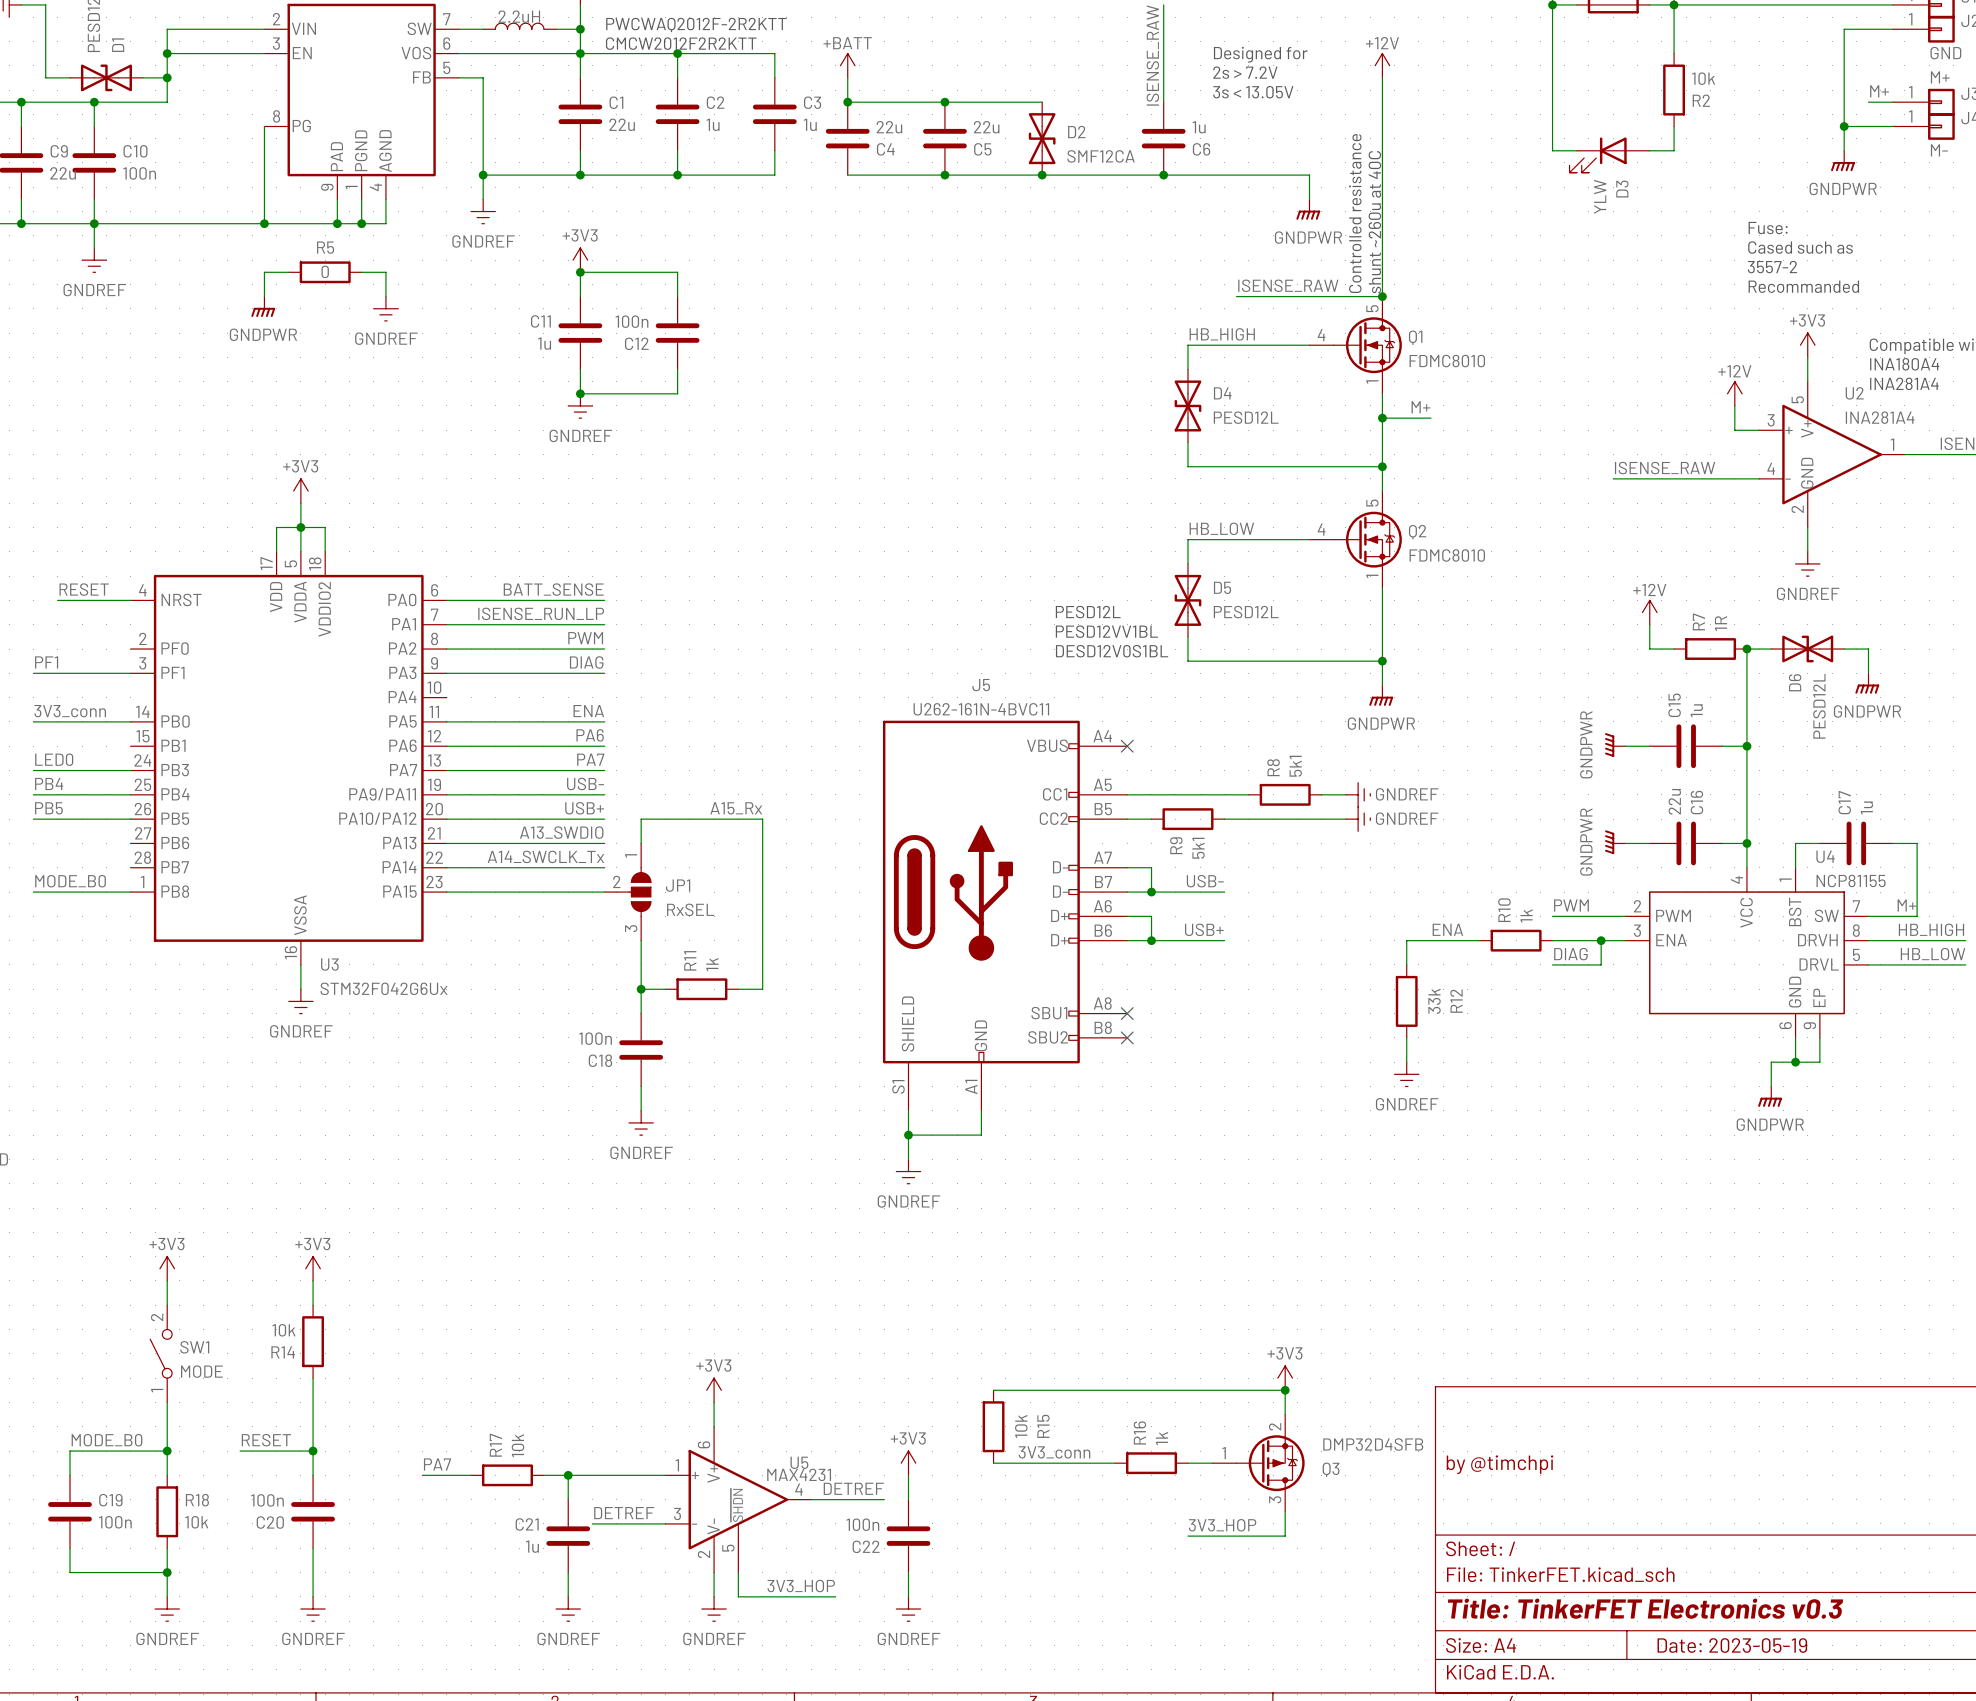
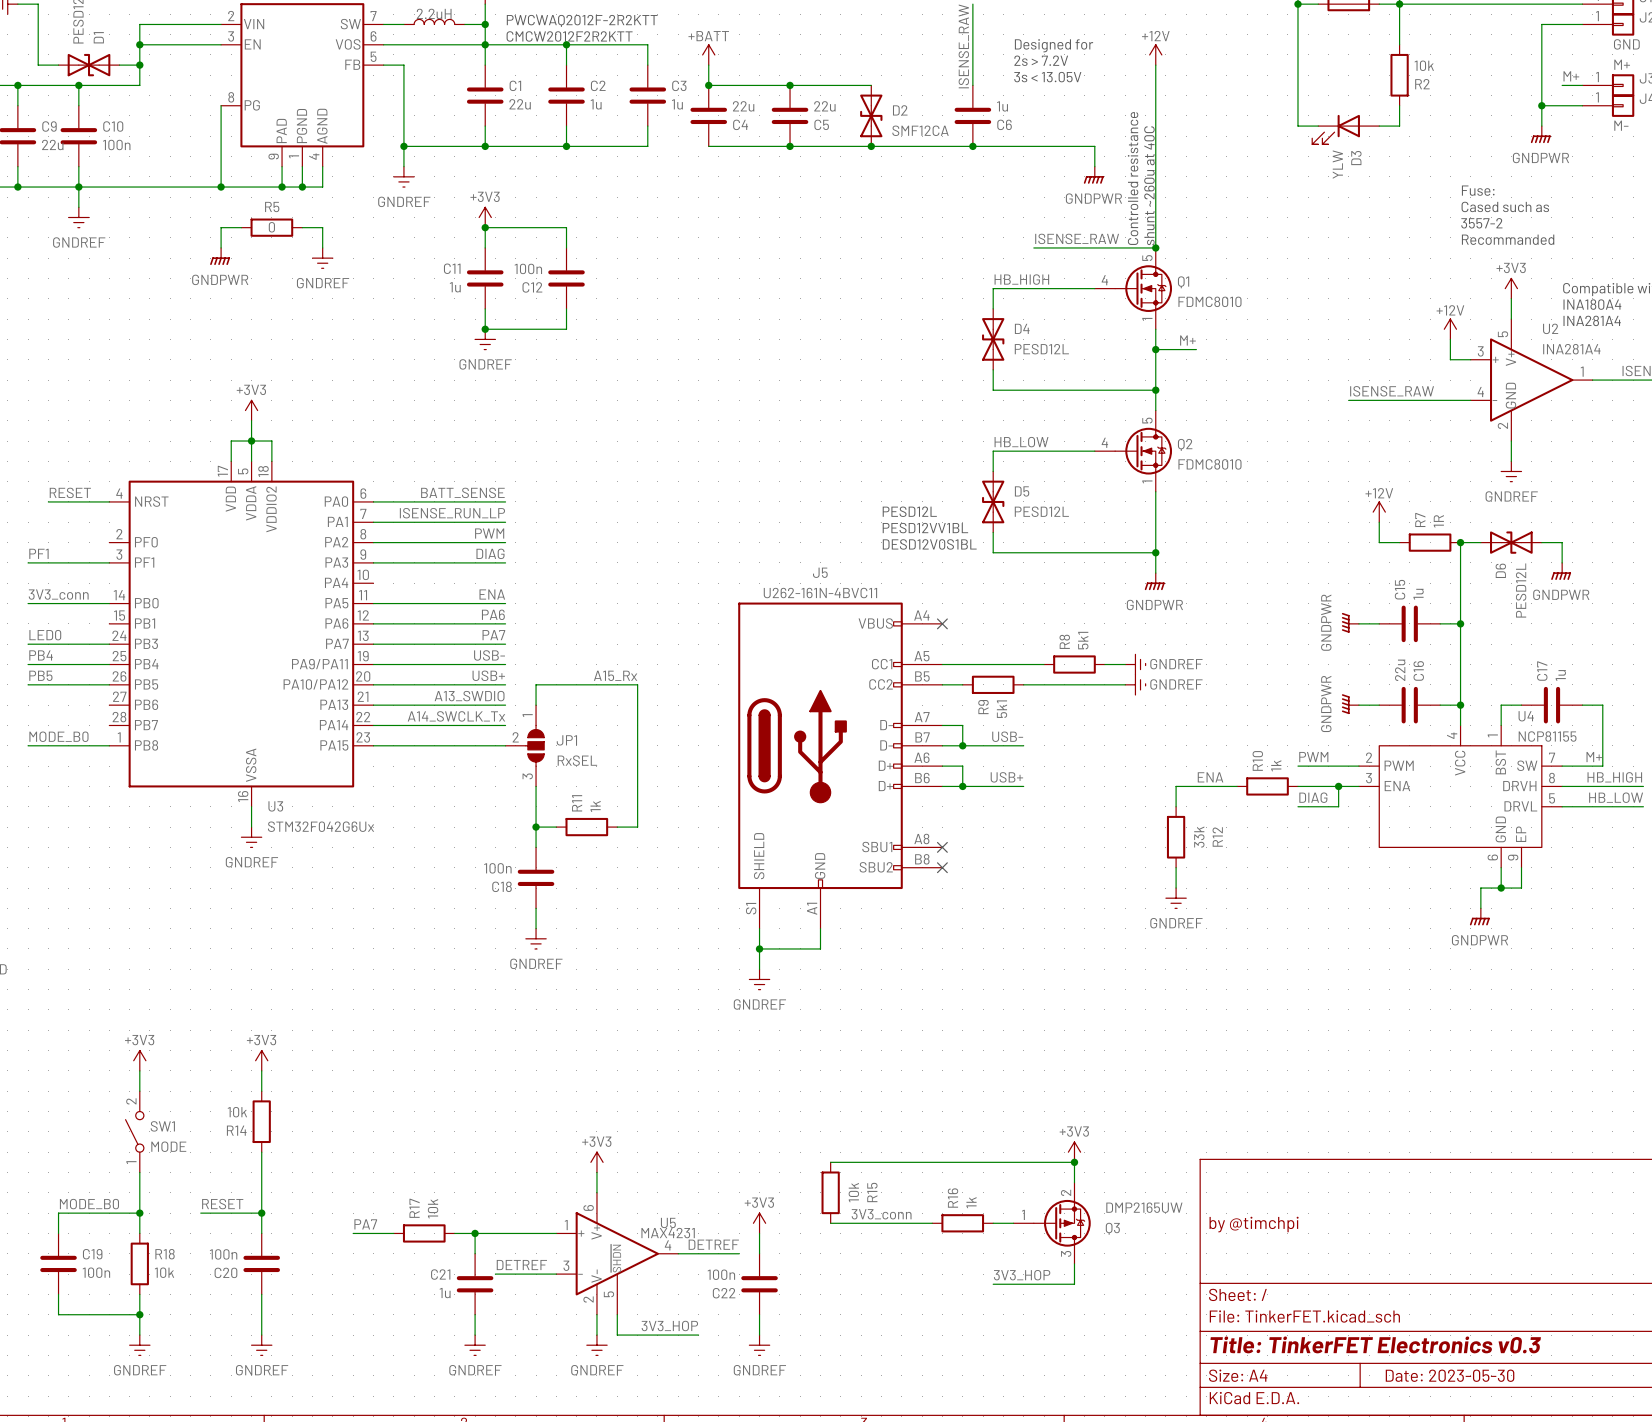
Q3 value: DMP32D4SFB (1373, 1444) -> DMP2165UW (1144, 1207)
title block: Date: 2023-05-19 (1732, 1645) -> Date: 2023-05-30 (1450, 1375)

